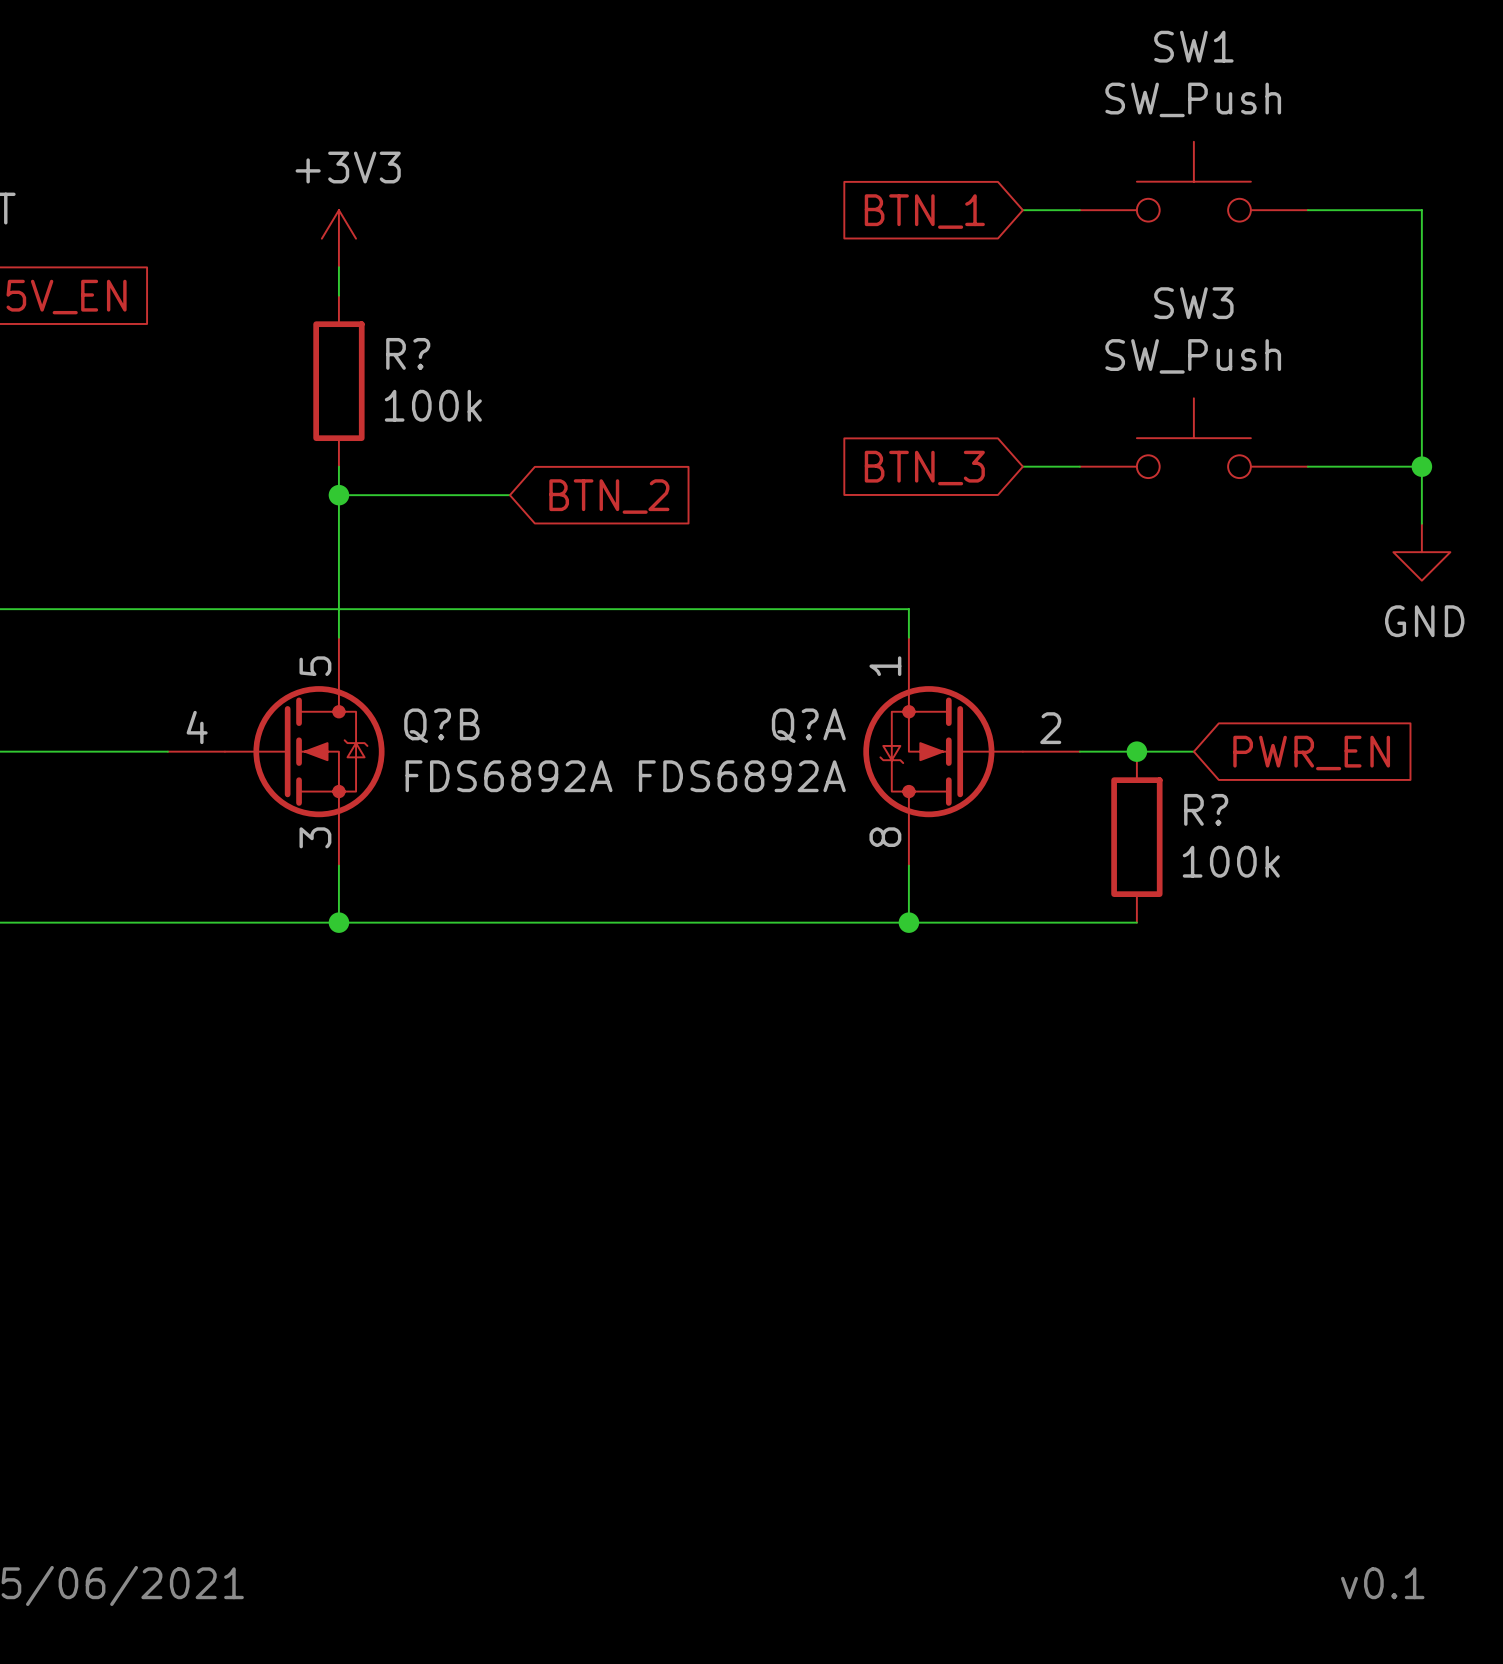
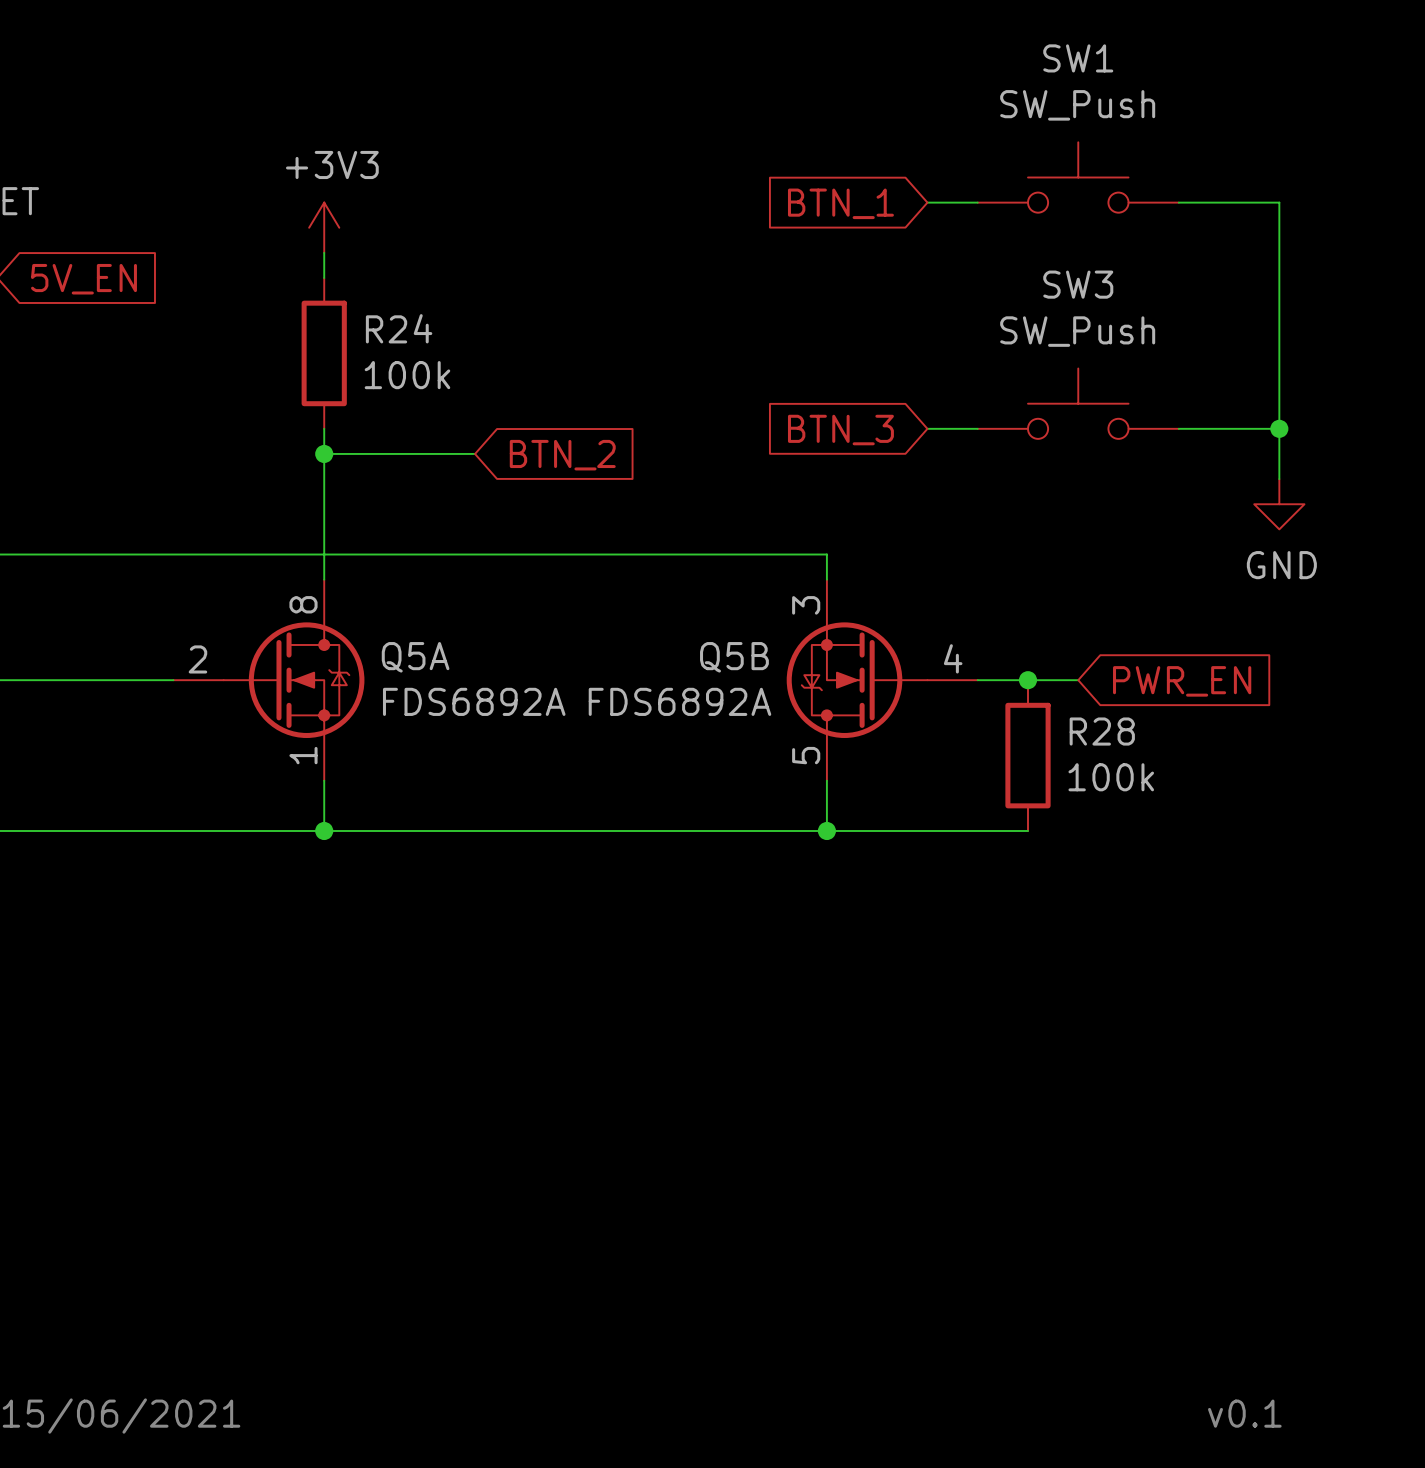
R? name: R? (408, 353) -> R24 (399, 328)
Q?B pin number: 5 (315, 666) -> 8 (303, 604)
Q?A pin number: 1 (885, 666) -> 3 (806, 605)
Q?B name: Q?B (441, 725) -> Q5A (415, 657)
Q?A name: Q?A (808, 725) -> Q5B (734, 657)
Q?B pin number: 4 (197, 727) -> 2 (197, 659)
Q?A pin number: 2 (1050, 728) -> 4 (953, 658)
R? name: R? (1206, 809) -> R28 (1102, 731)
Q?B pin number: 3 (315, 837) -> 1 (303, 755)
Q?A pin number: 8 (885, 837) -> 5 (806, 755)

